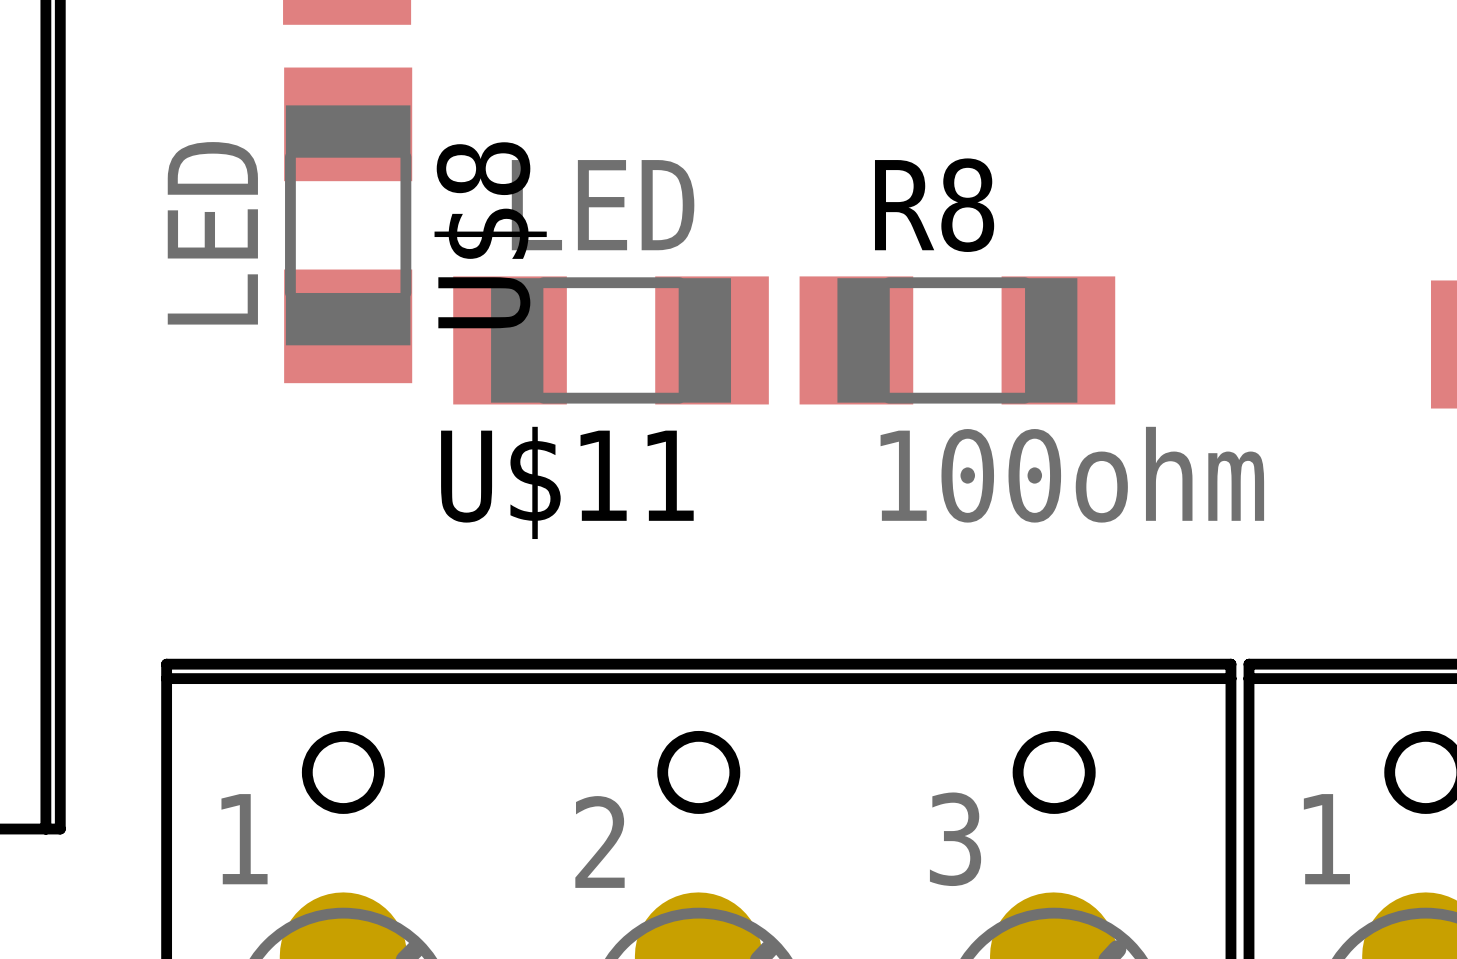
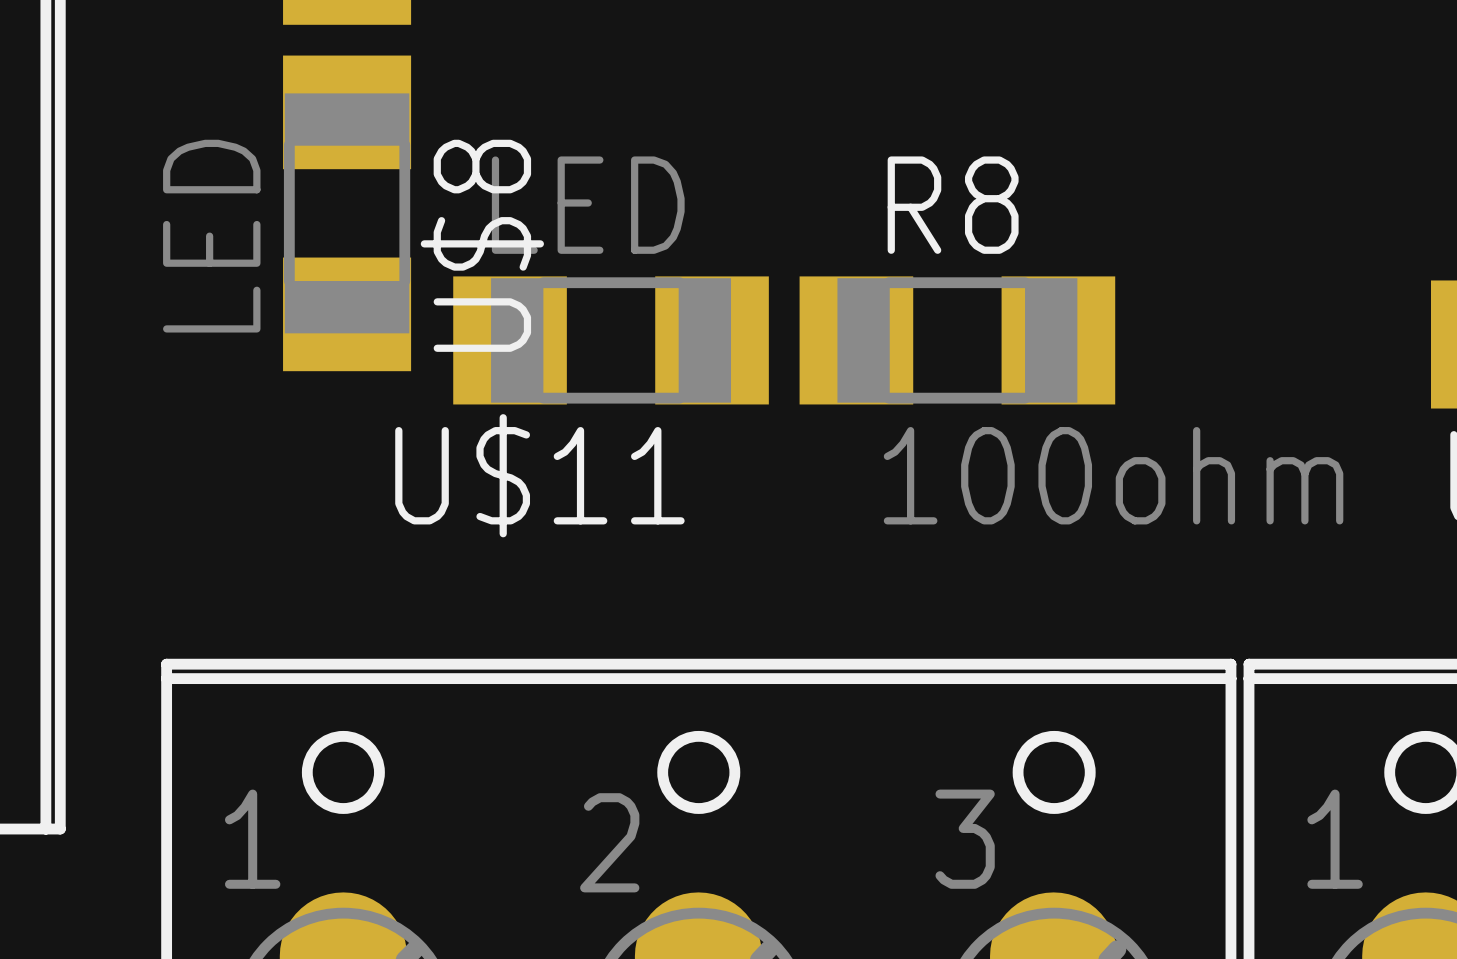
U$8 position: (348, 225) -> (347, 213)

